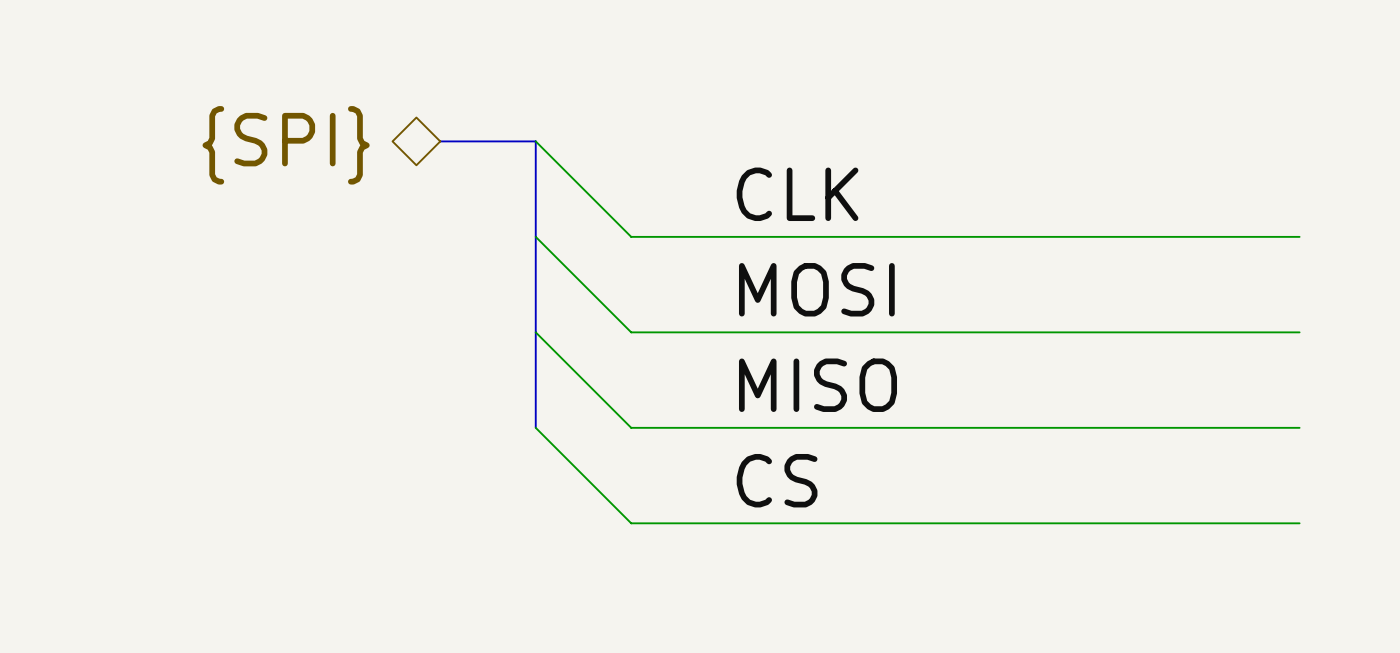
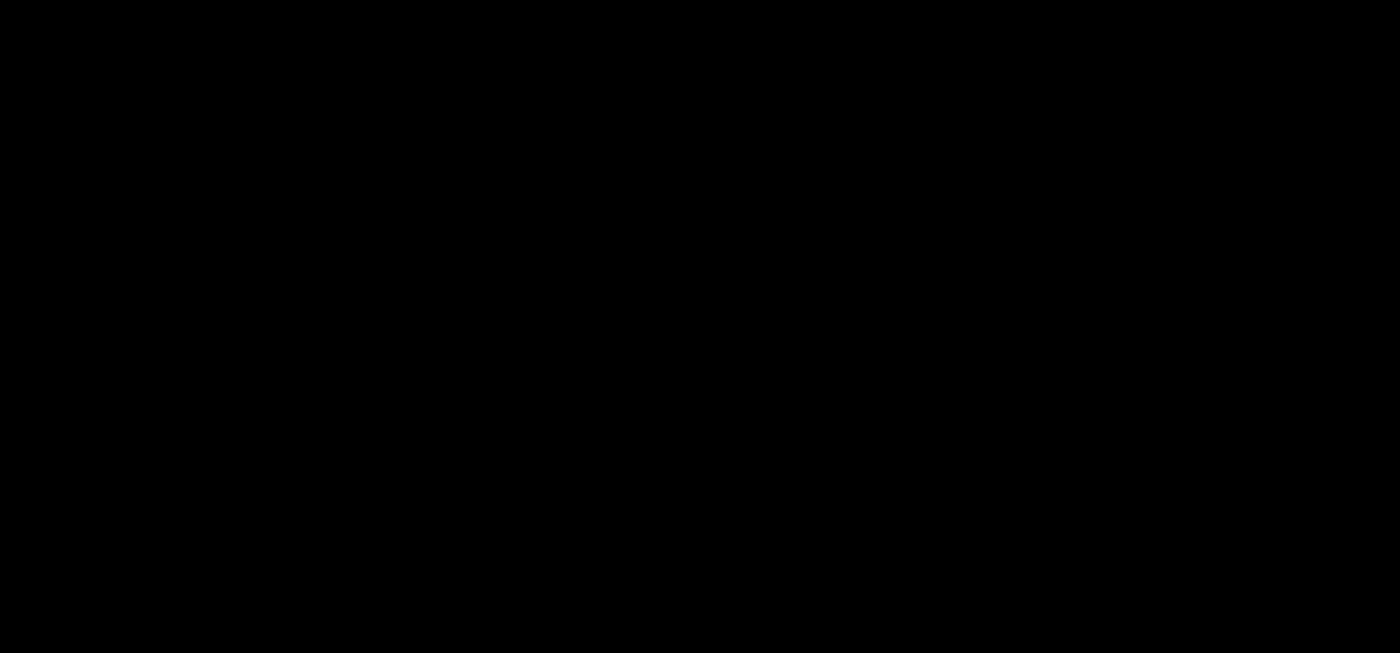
bus: (440, 141) (535, 141) (535, 427) -> none
wire: (535, 141) (631, 236) (1299, 236) -> none
hierarchical label: {SPI} (286, 145) -> none
label: CLK (797, 194) -> none
wire: (535, 236) (631, 332) (1299, 332) -> none
label: MOSI (816, 289) -> none
wire: (535, 332) (631, 427) (1299, 427) -> none
label: MISO (817, 385) -> none
wire: (535, 427) (631, 523) (1299, 523) -> none
label: CS (777, 480) -> none

